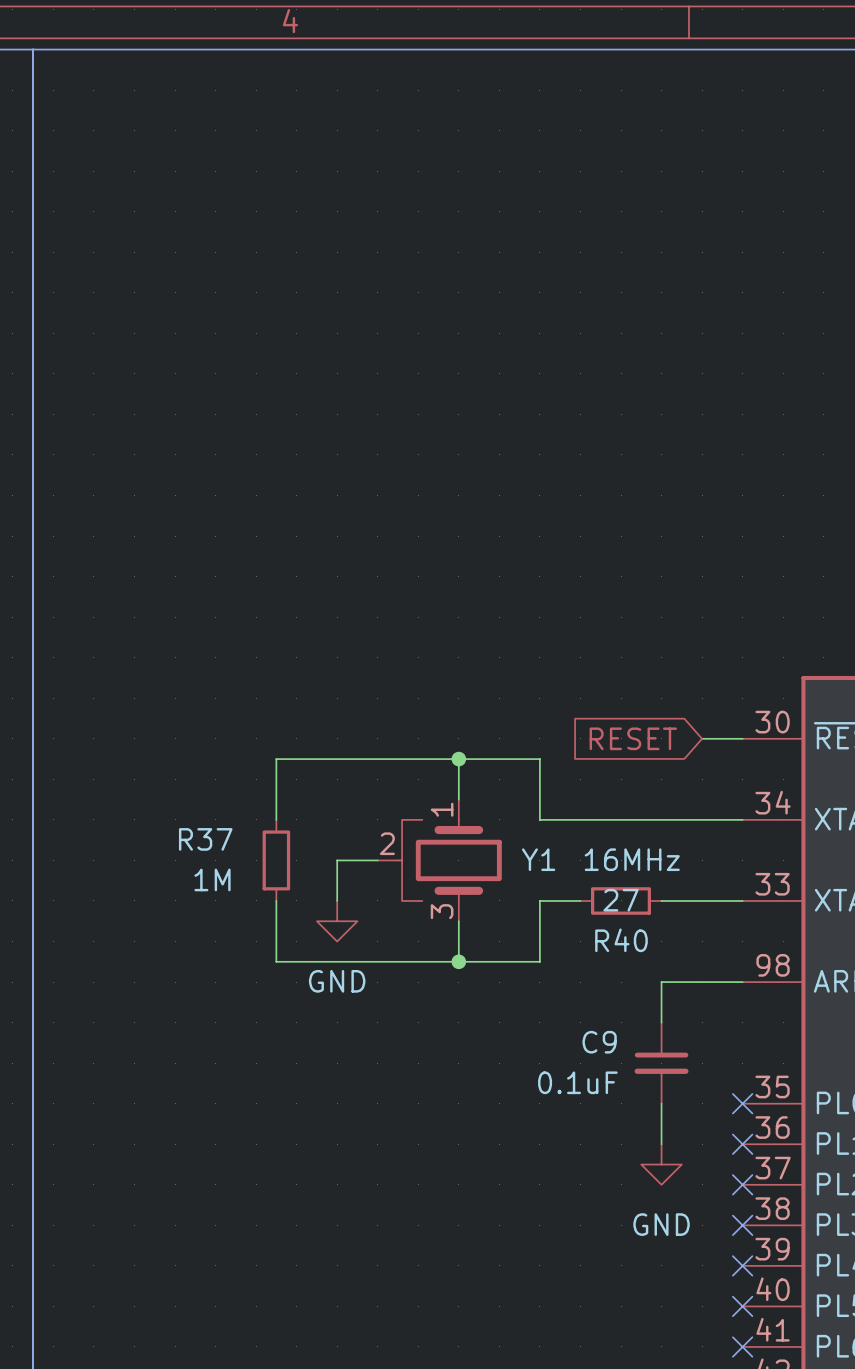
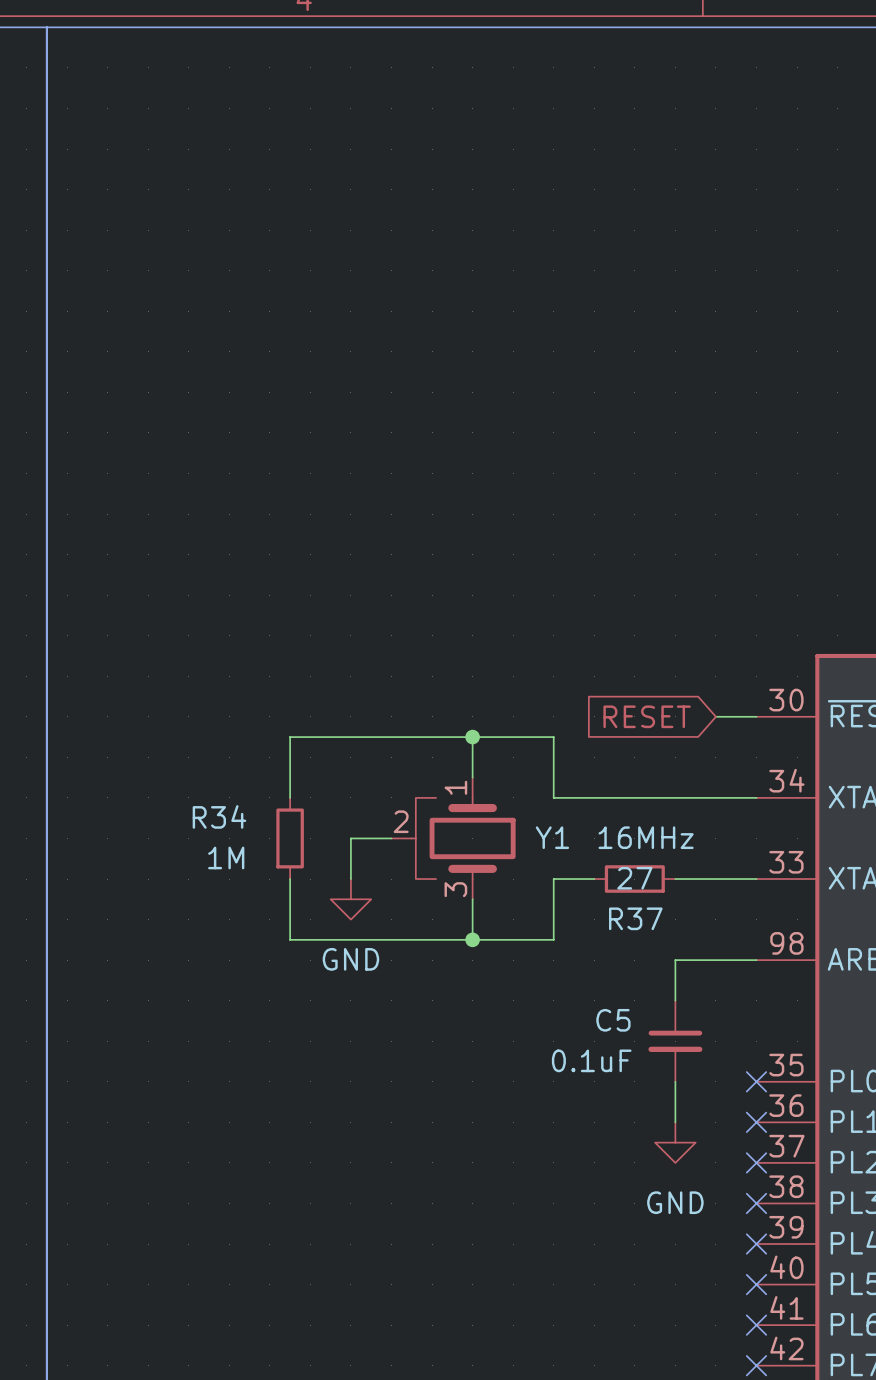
R37 name: R37 (205, 839) -> R34 (219, 816)
R40 name: R40 (621, 940) -> R37 (635, 918)
C9 name: C9 (599, 1042) -> C5 (613, 1020)

